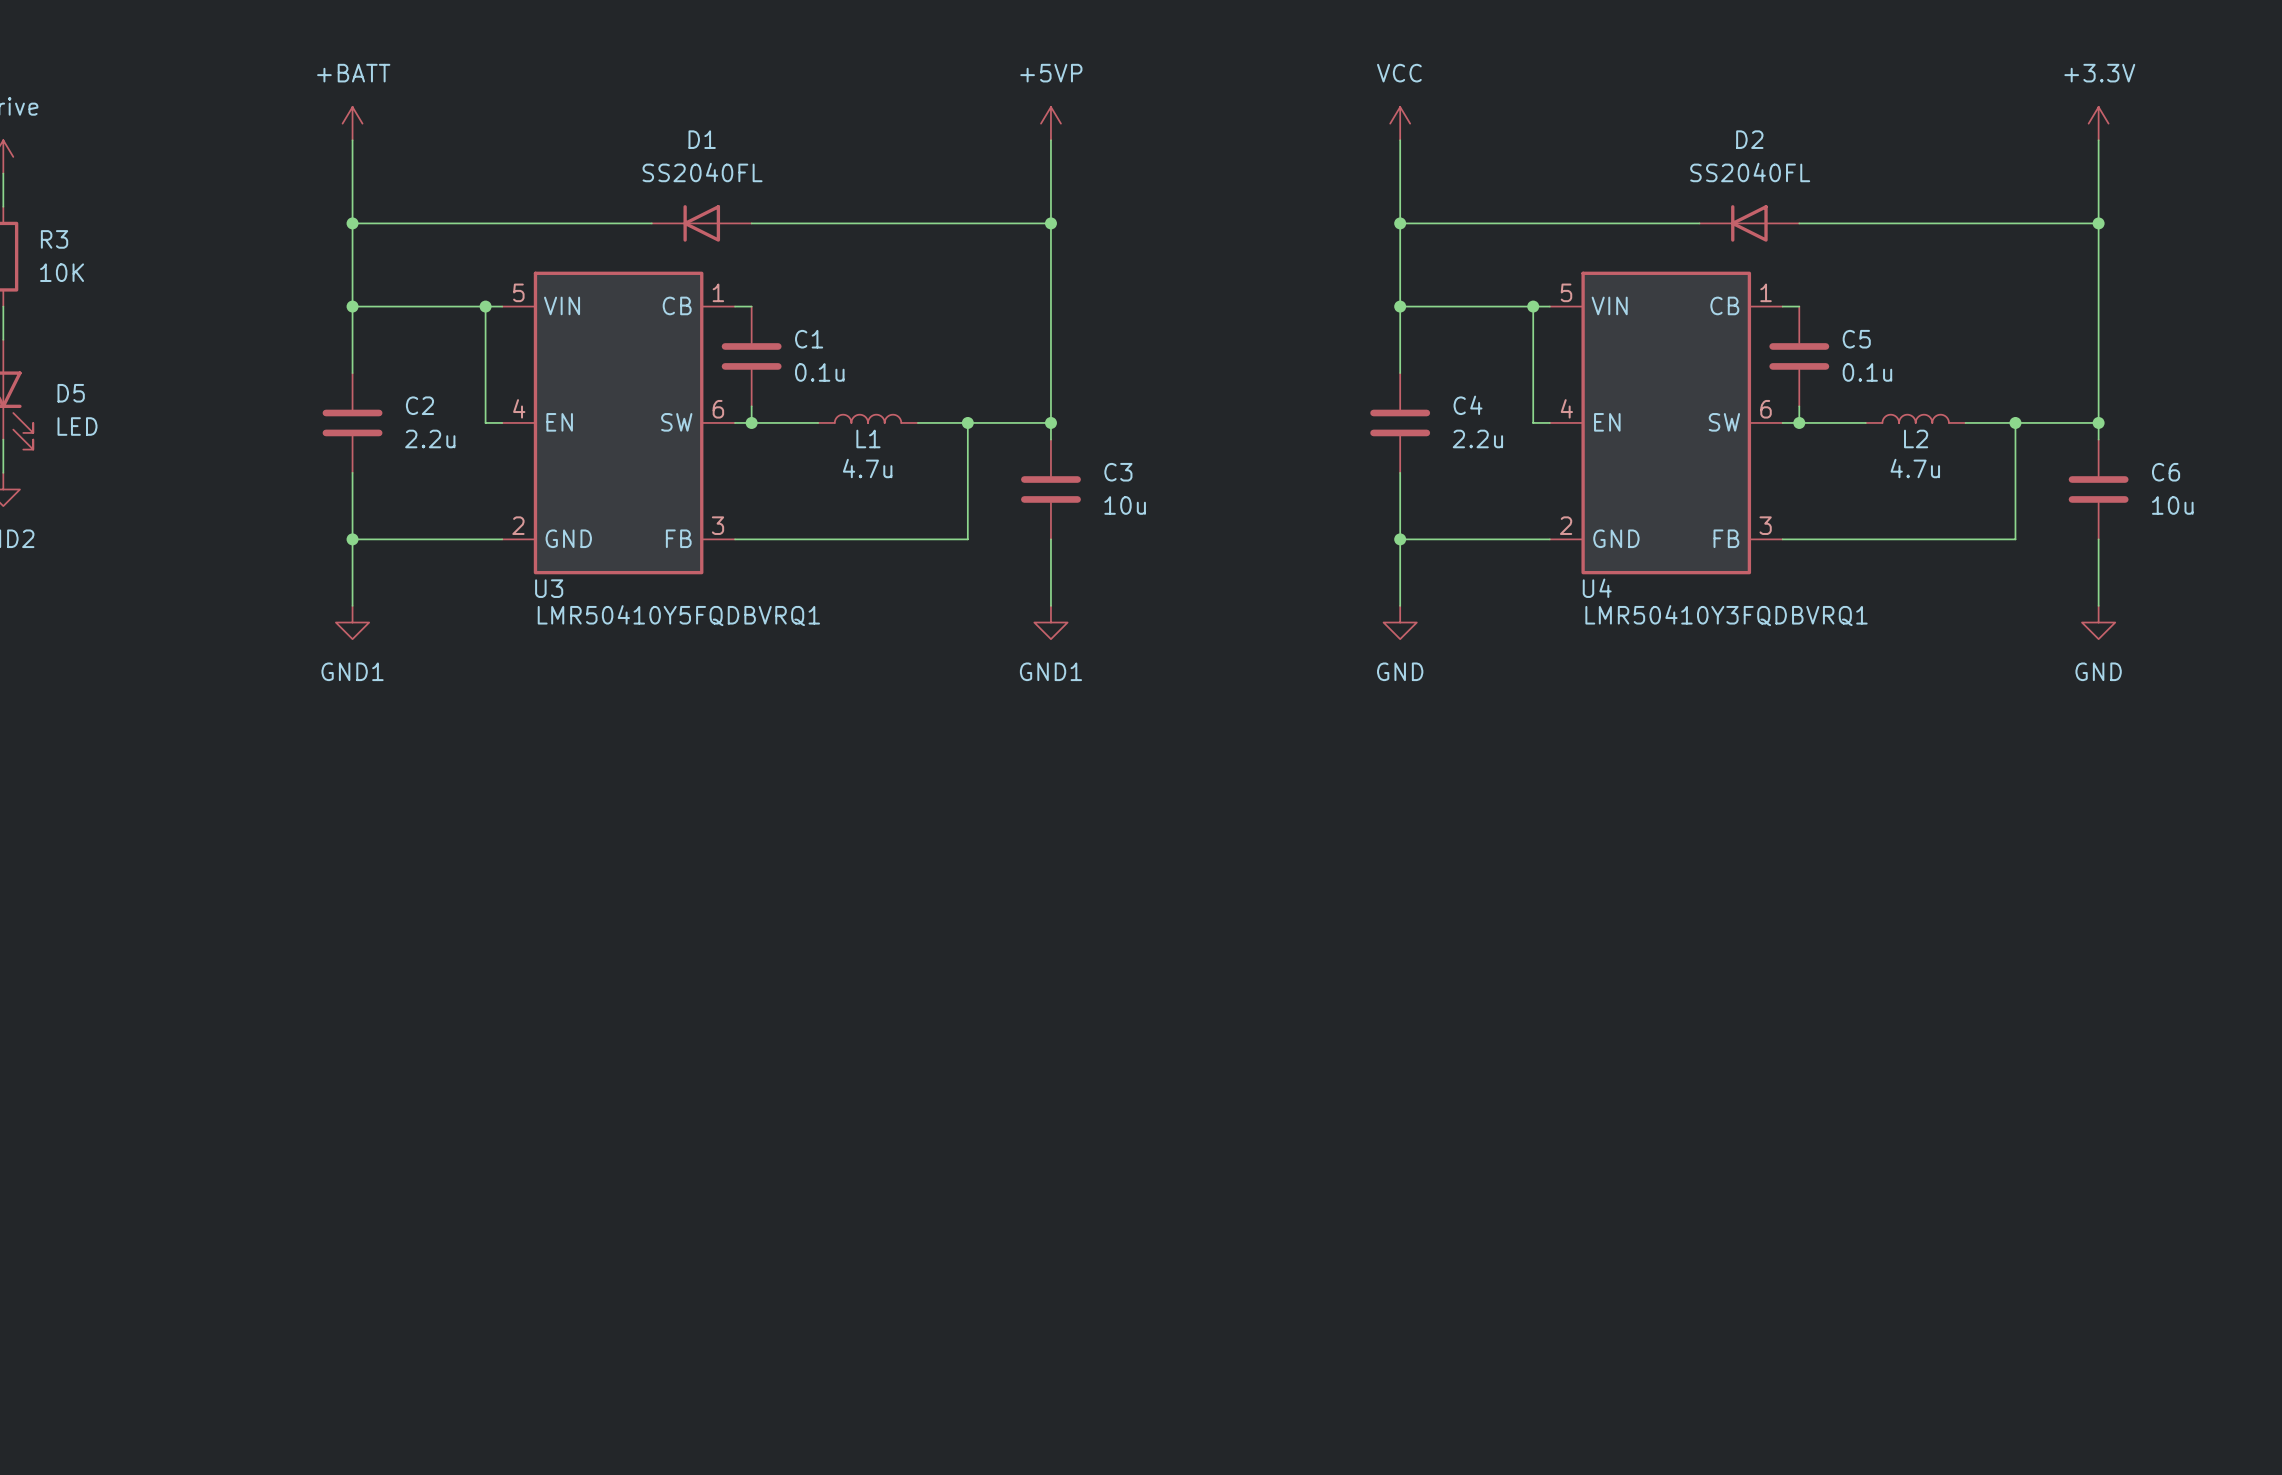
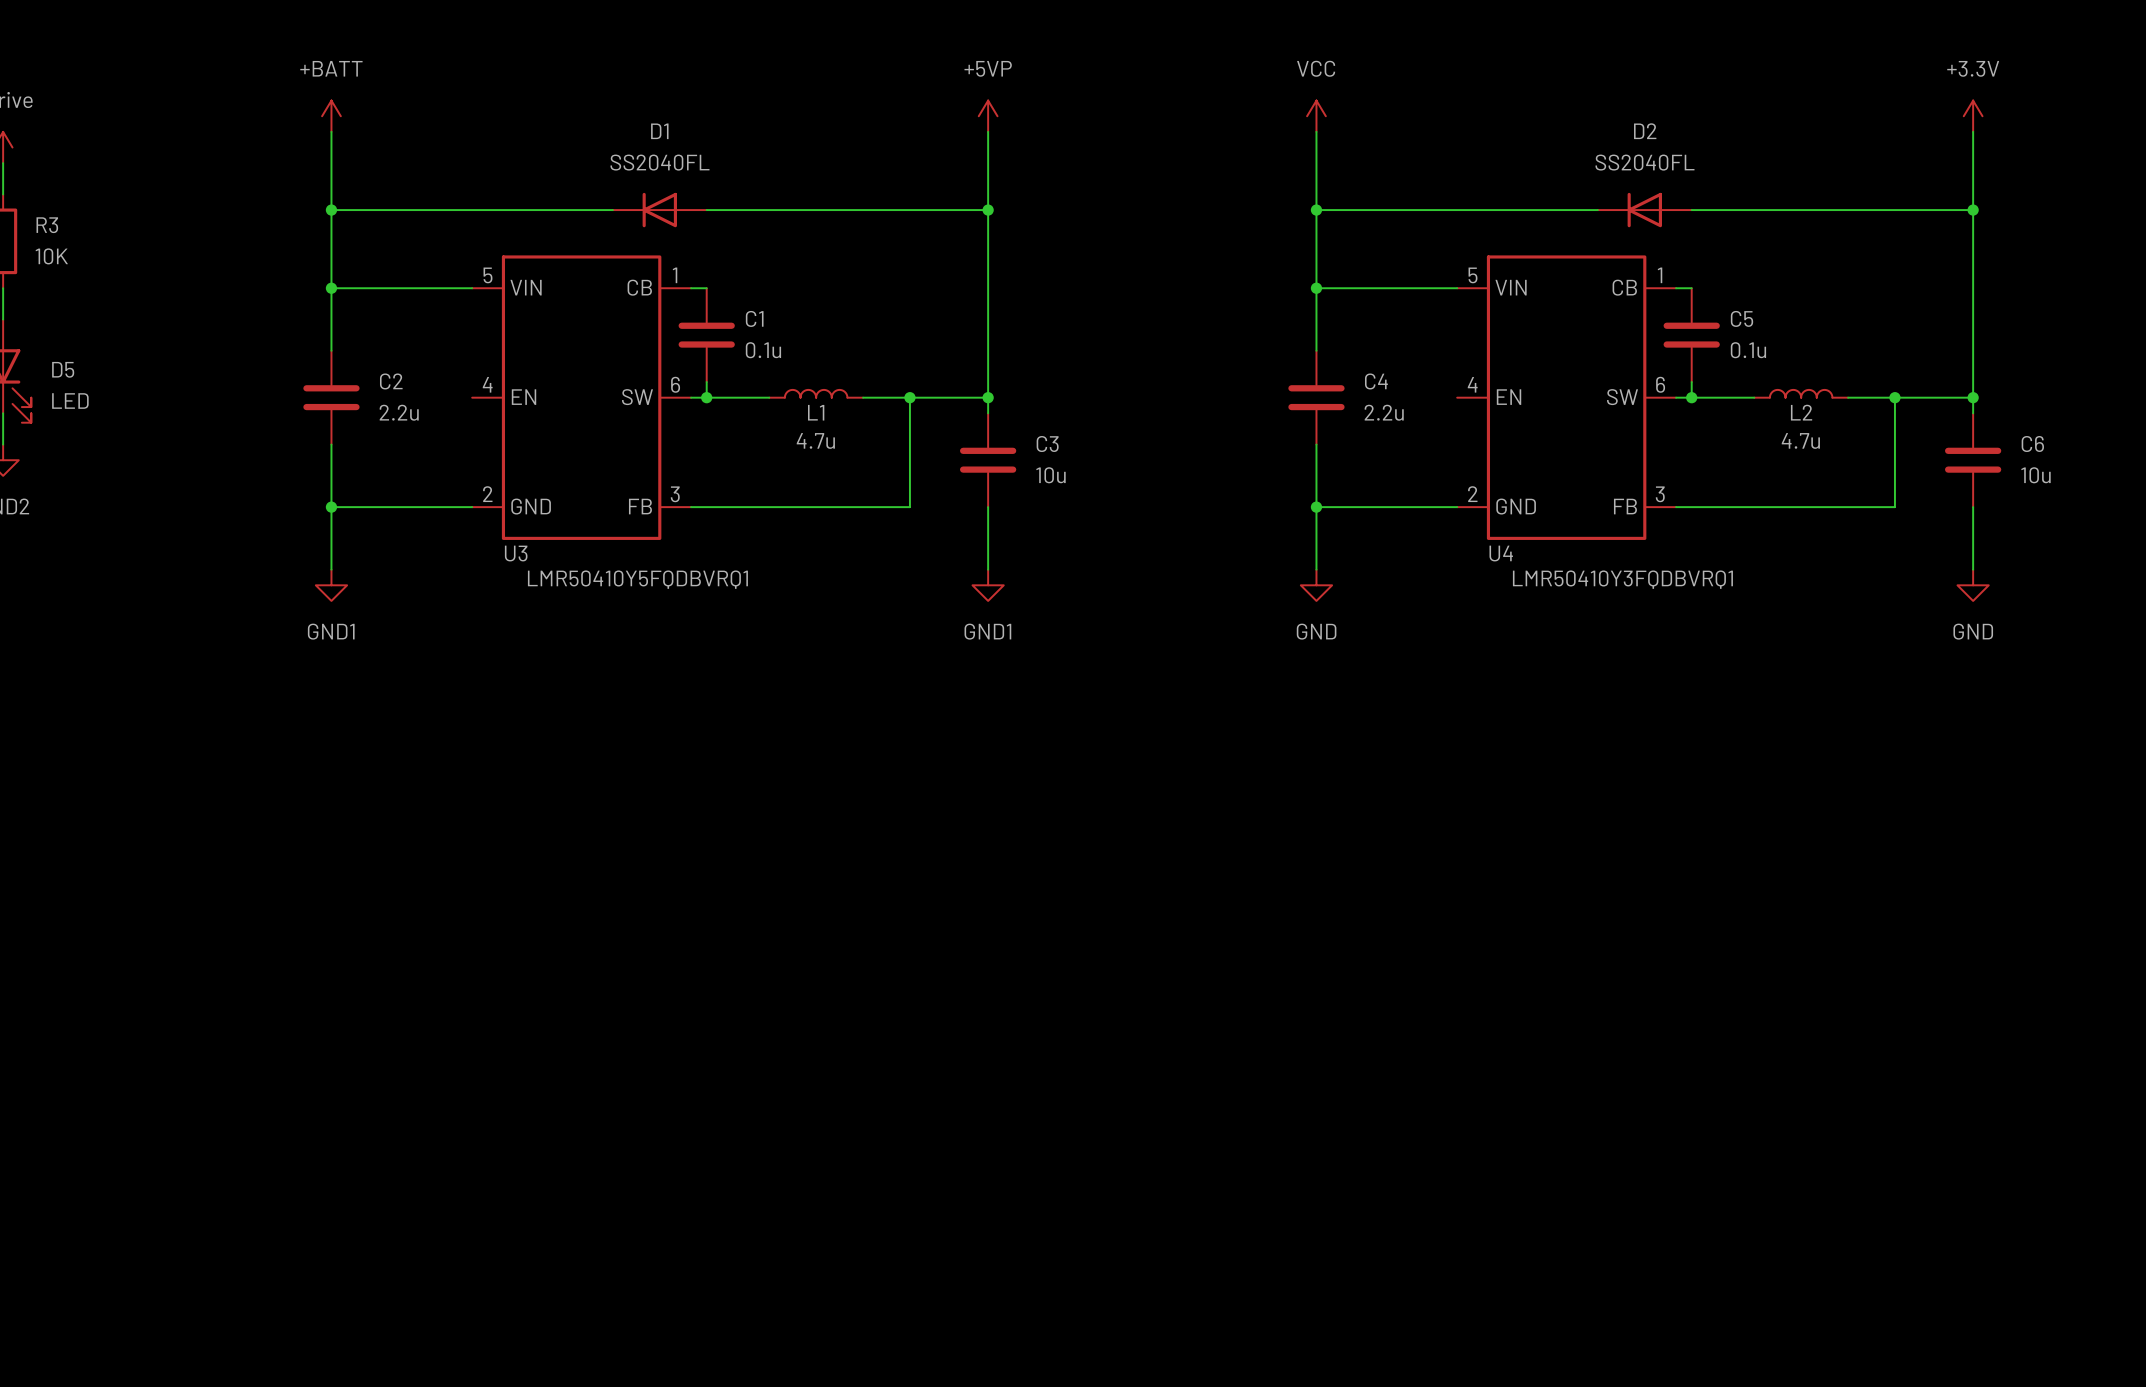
wire: (485, 306) (485, 422) (502, 422) -> none
junction: (485, 306) -> none
wire: (1533, 306) (1533, 422) (1549, 422) -> none
junction: (1533, 306) -> none

